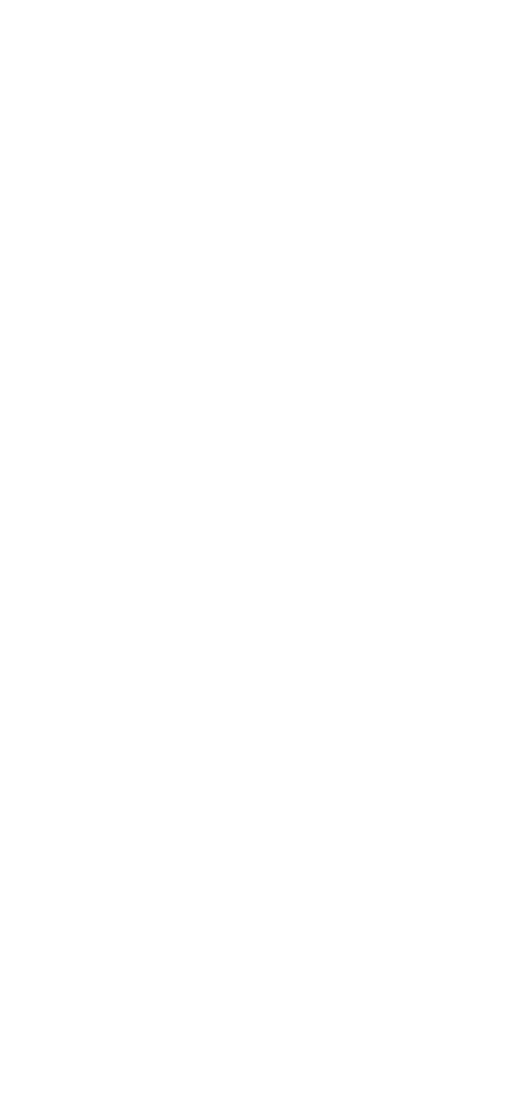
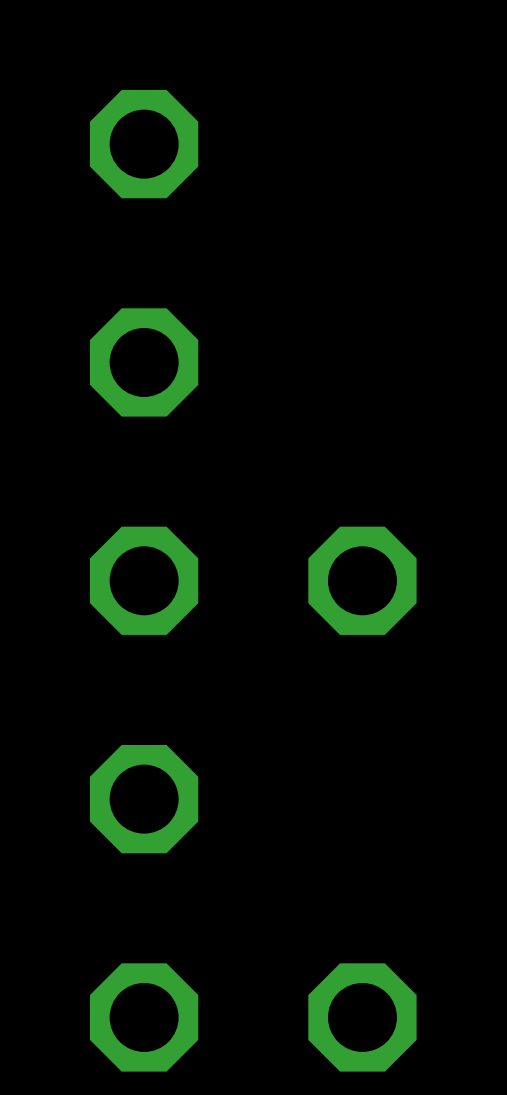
part: none -> (144, 144)
part: none -> (144, 362)
part: none -> (144, 580)
part: none -> (362, 580)
part: none -> (144, 799)
part: none -> (144, 1017)
part: none -> (362, 1017)

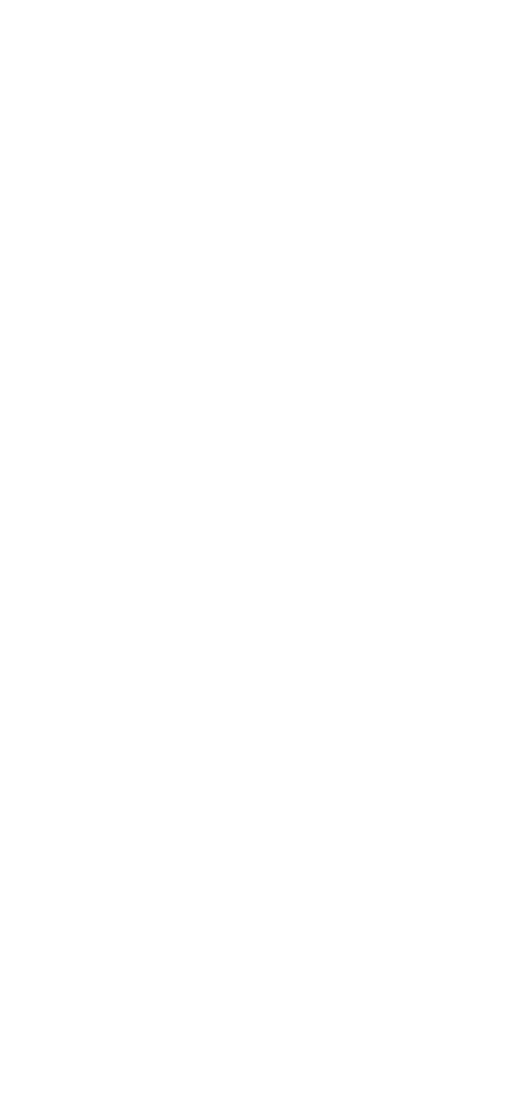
part: (144, 144) -> none
part: (144, 362) -> none
part: (144, 580) -> none
part: (362, 580) -> none
part: (144, 799) -> none
part: (144, 1017) -> none
part: (362, 1017) -> none

